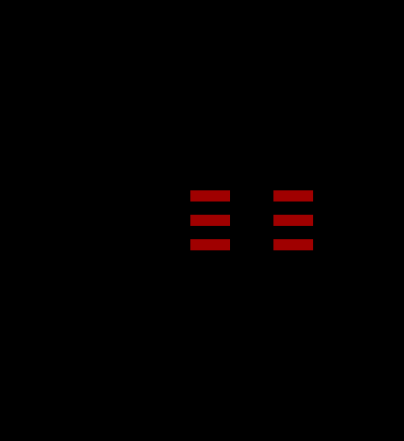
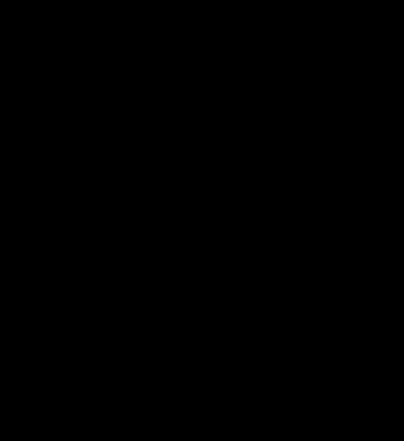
part: (251, 220) -> none

